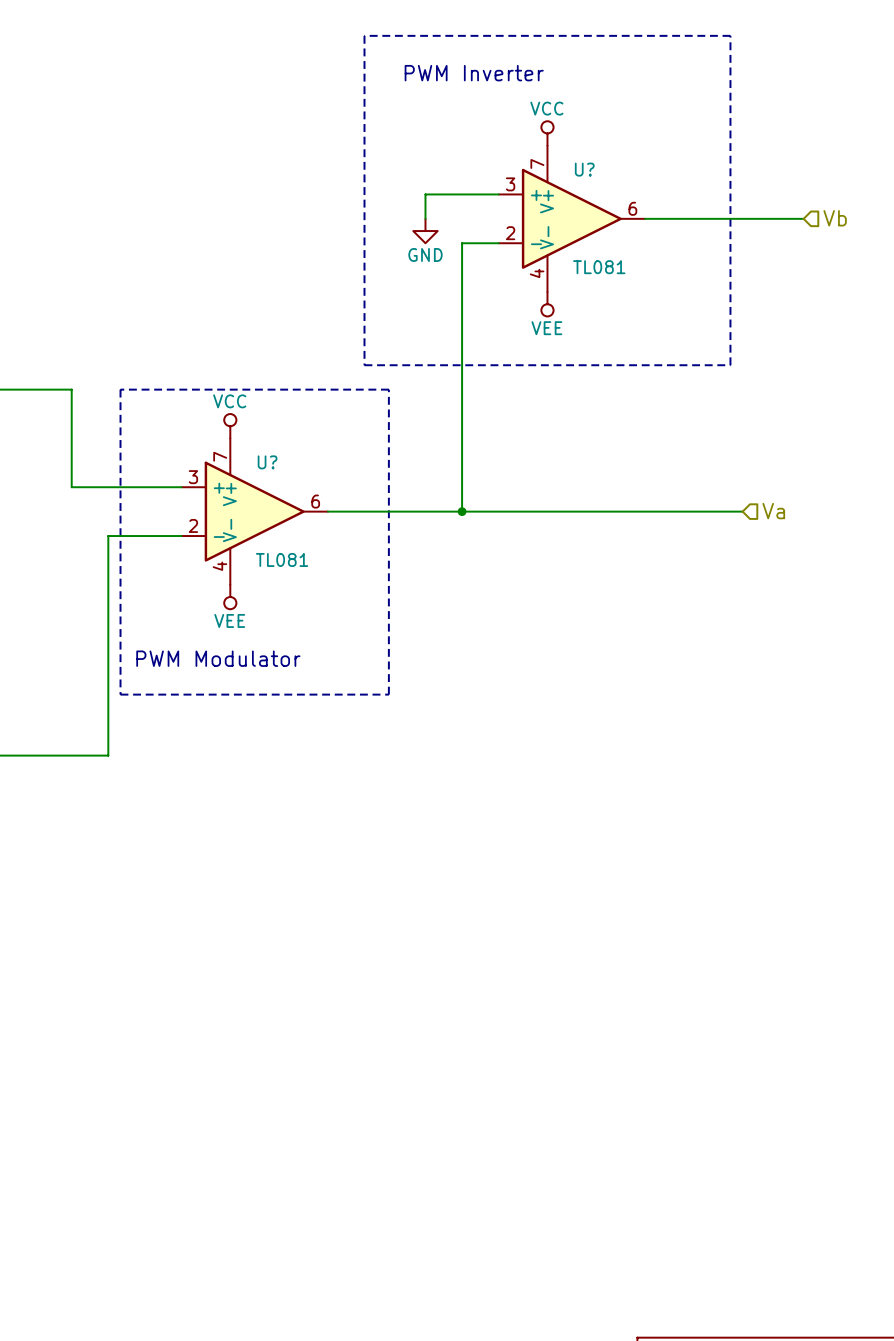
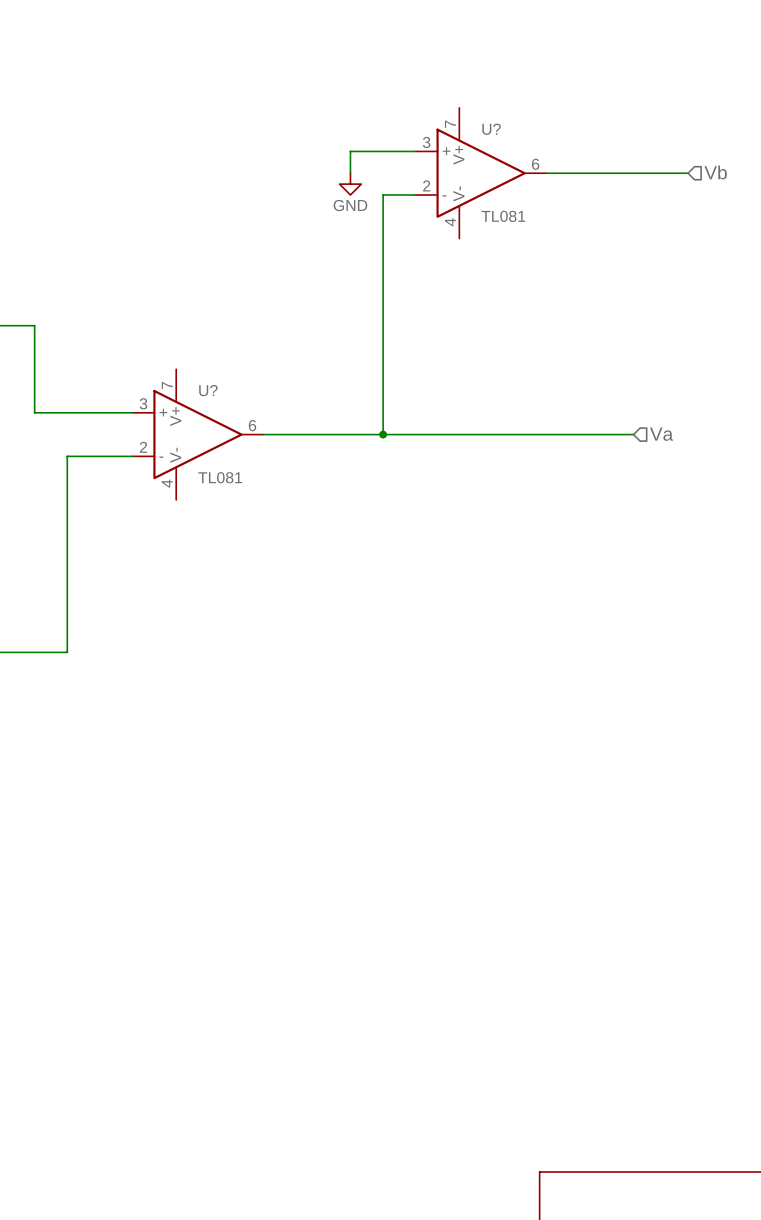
line: (364, 35) (364, 365) (730, 365) (730, 35) (364, 35) -> none
text: PWM Inverter (474, 73) -> none
power symbol: VCC (547, 133) -> none
power symbol: VEE (547, 304) -> none
line: (120, 389) (120, 694) (388, 694) (388, 389) (120, 389) -> none
power symbol: VCC (230, 426) -> none
power symbol: VEE (230, 597) -> none
text: PWM Modulator (218, 658) -> none

